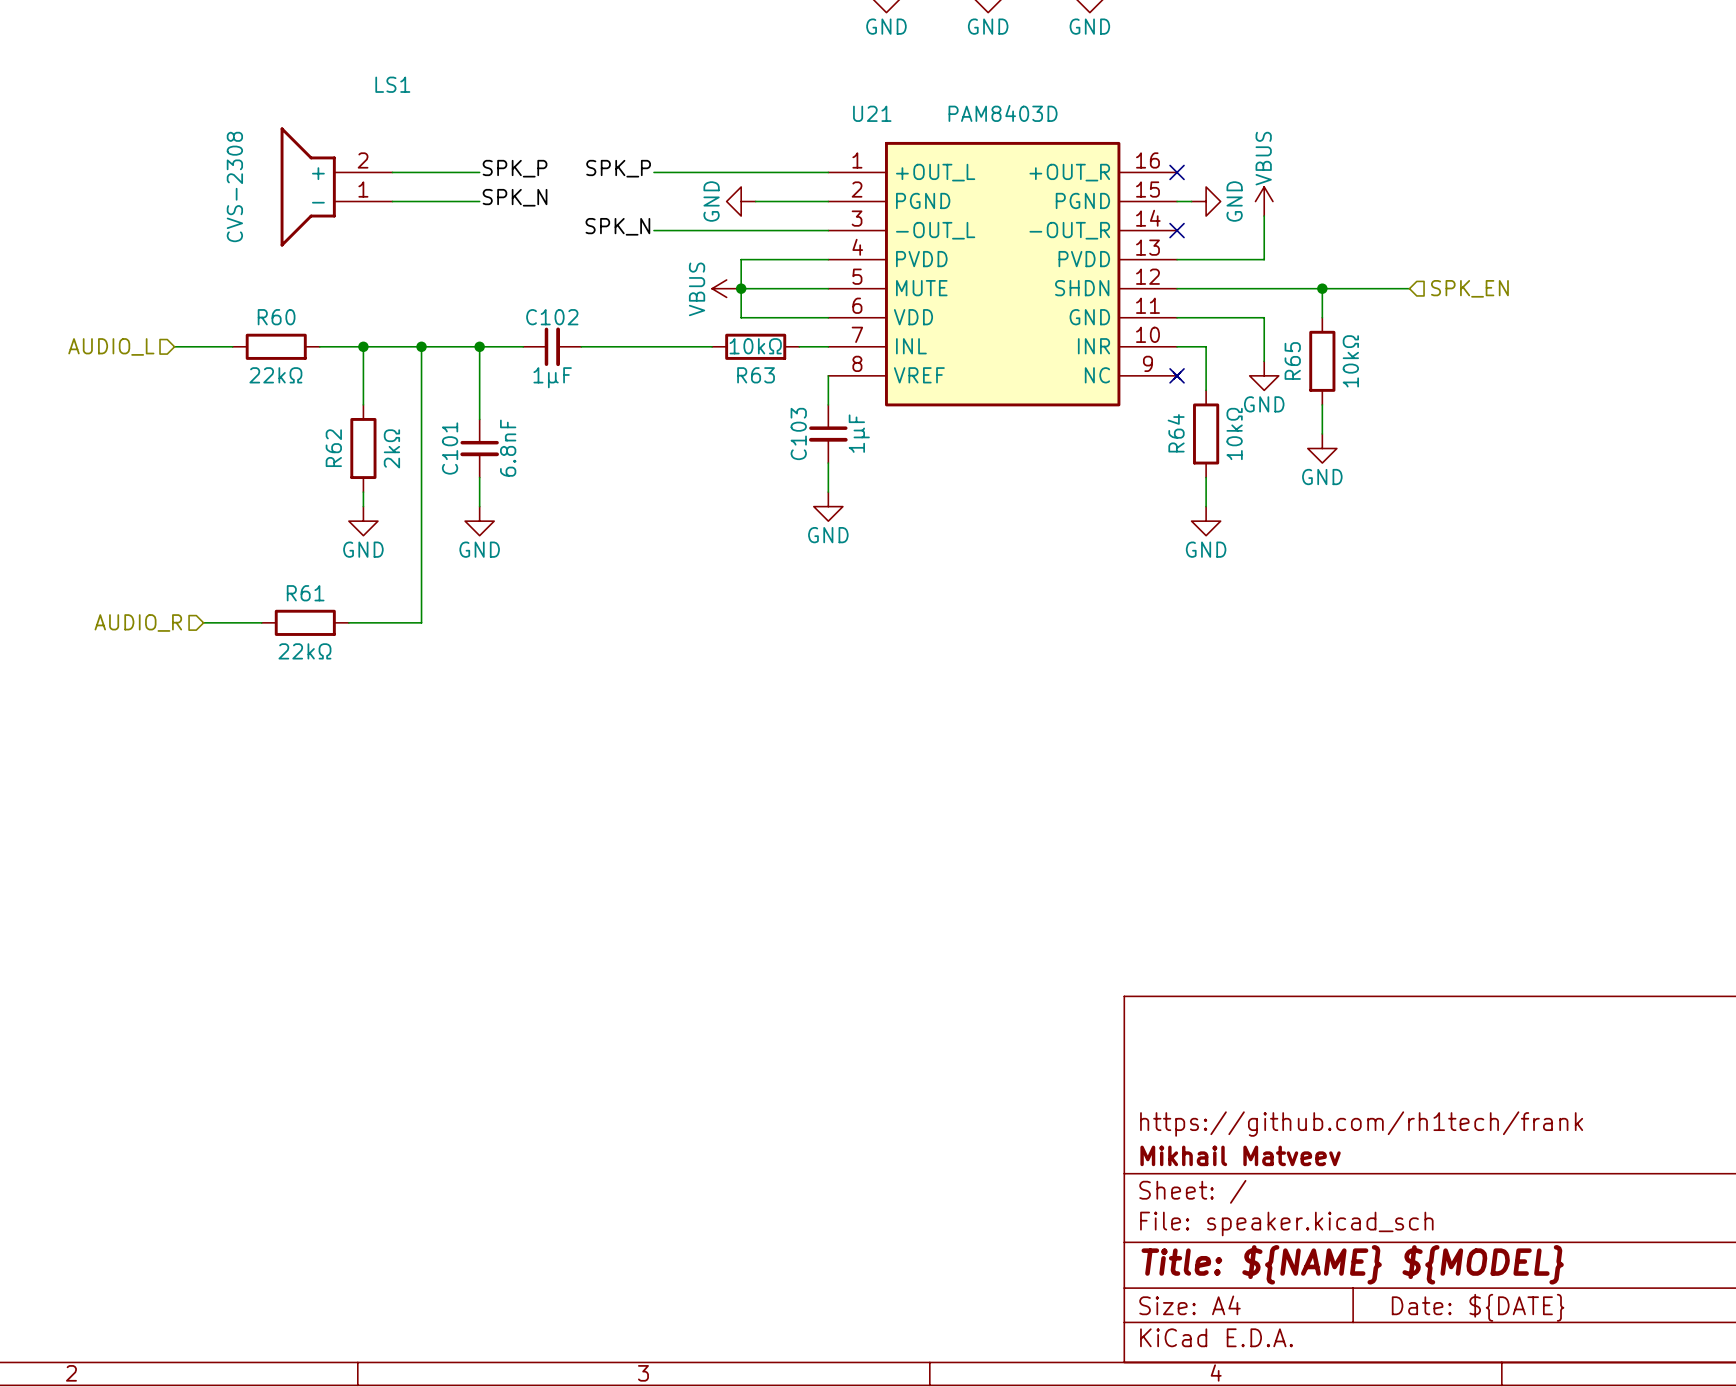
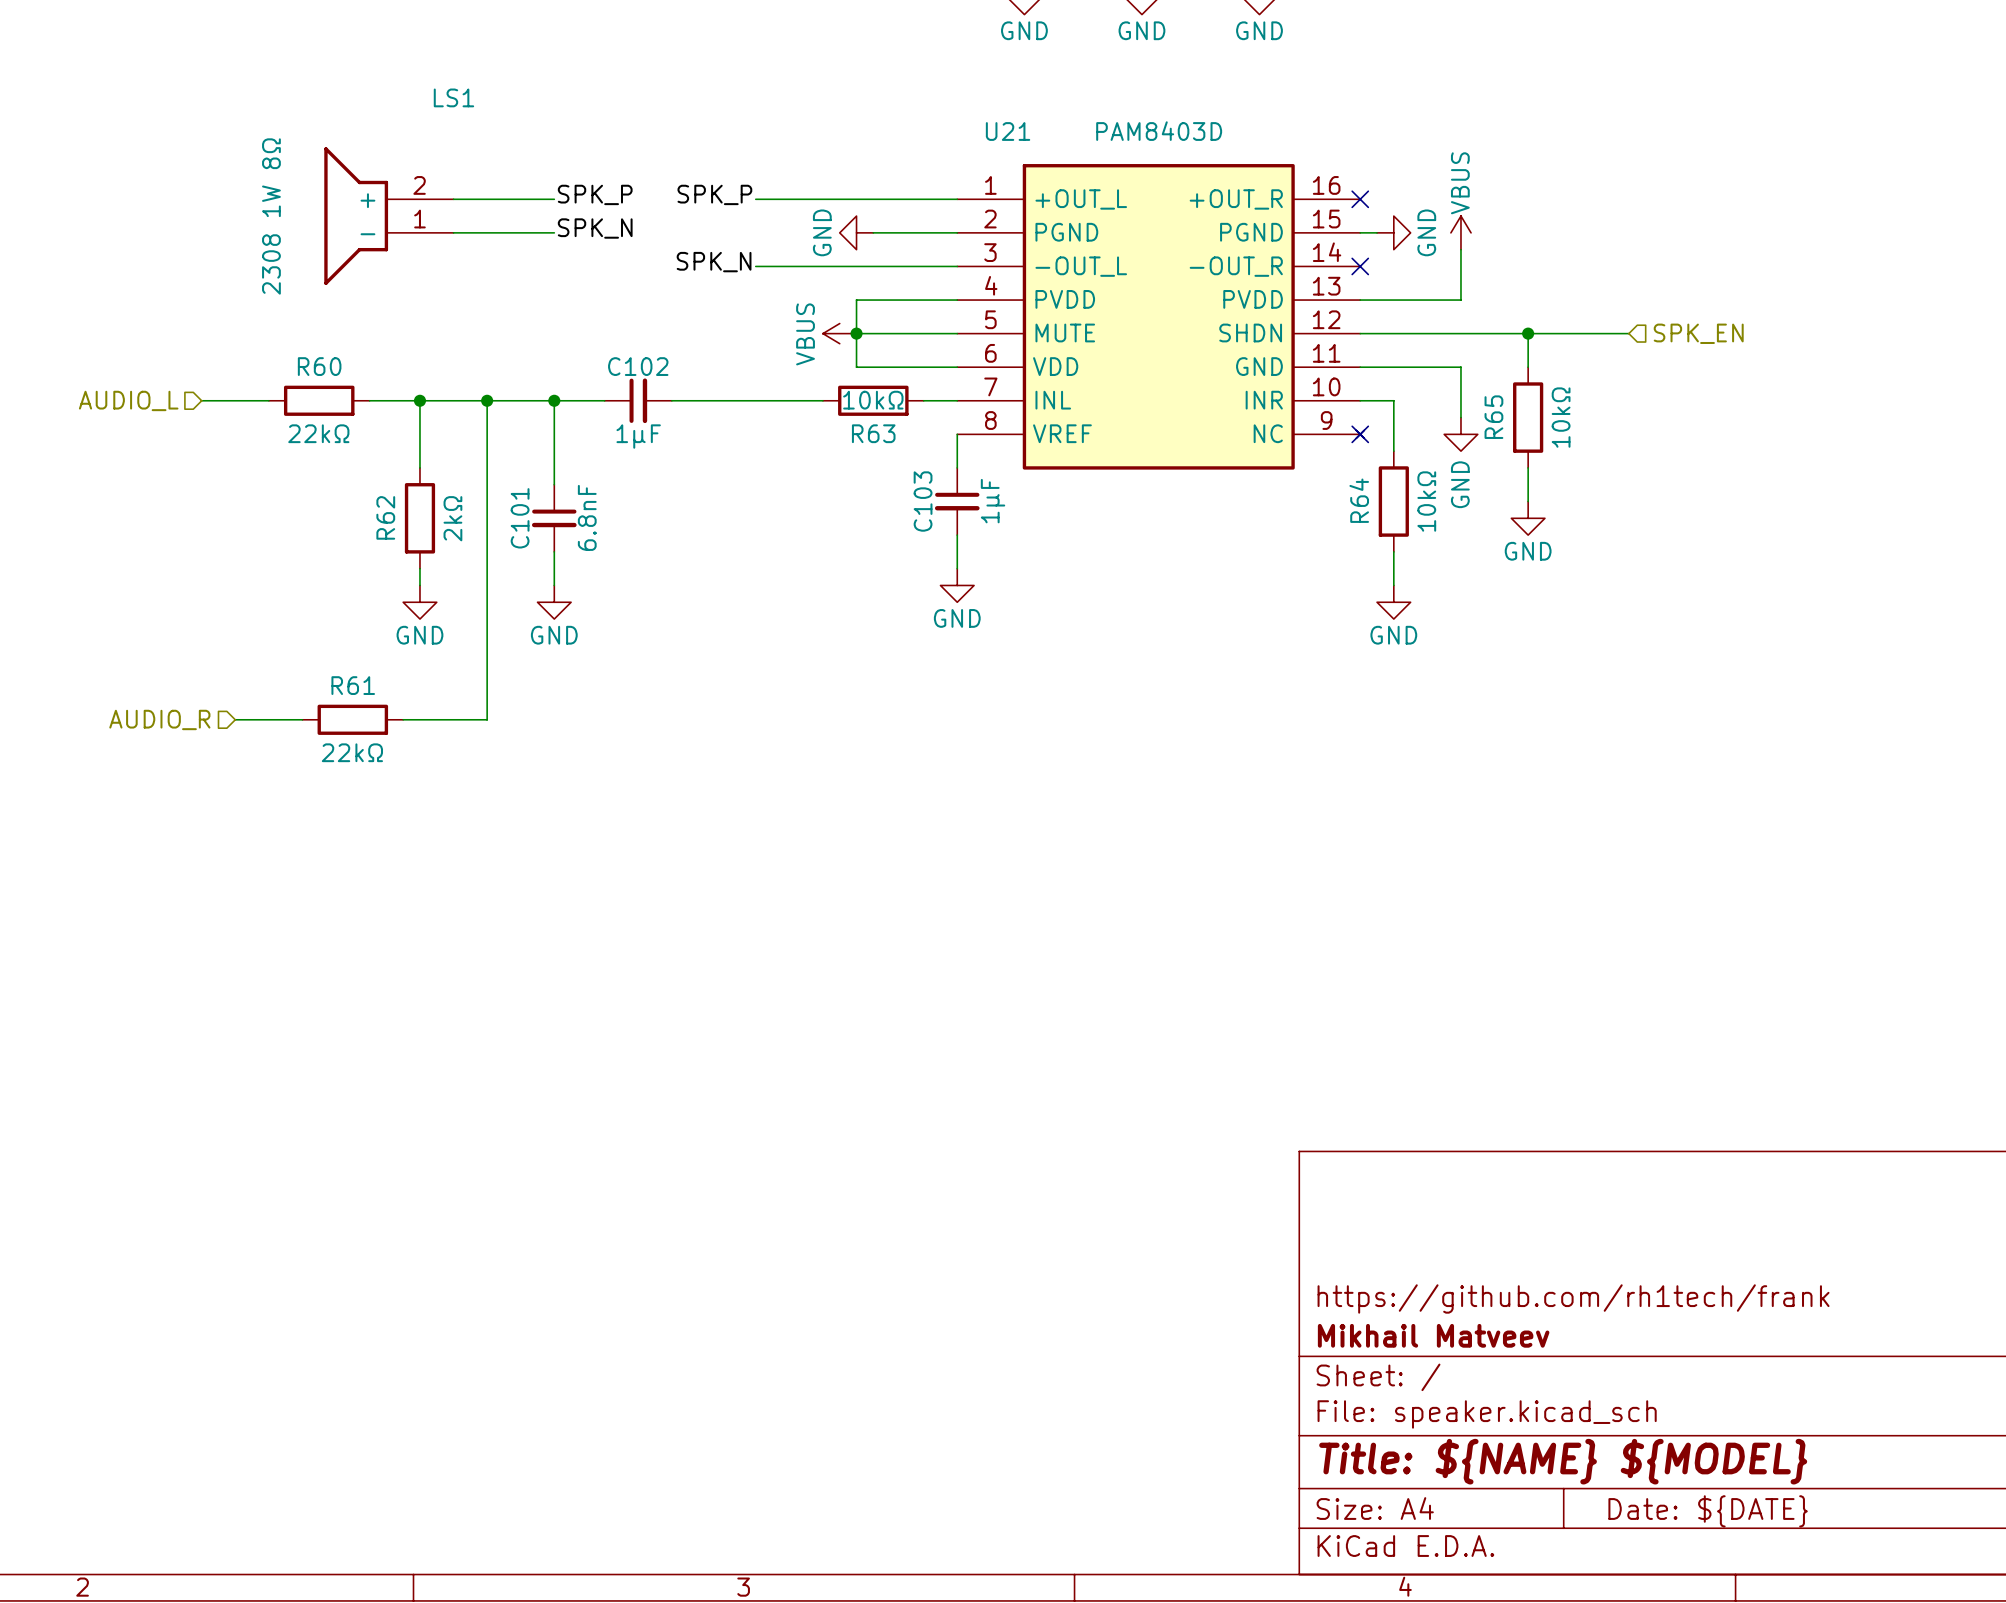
LS1 value: CVS-2308 (234, 186) -> 2308 1W 8Ω (271, 216)
power symbol text rotation: 0° (1264, 404) -> 90° counterclockwise (1460, 484)

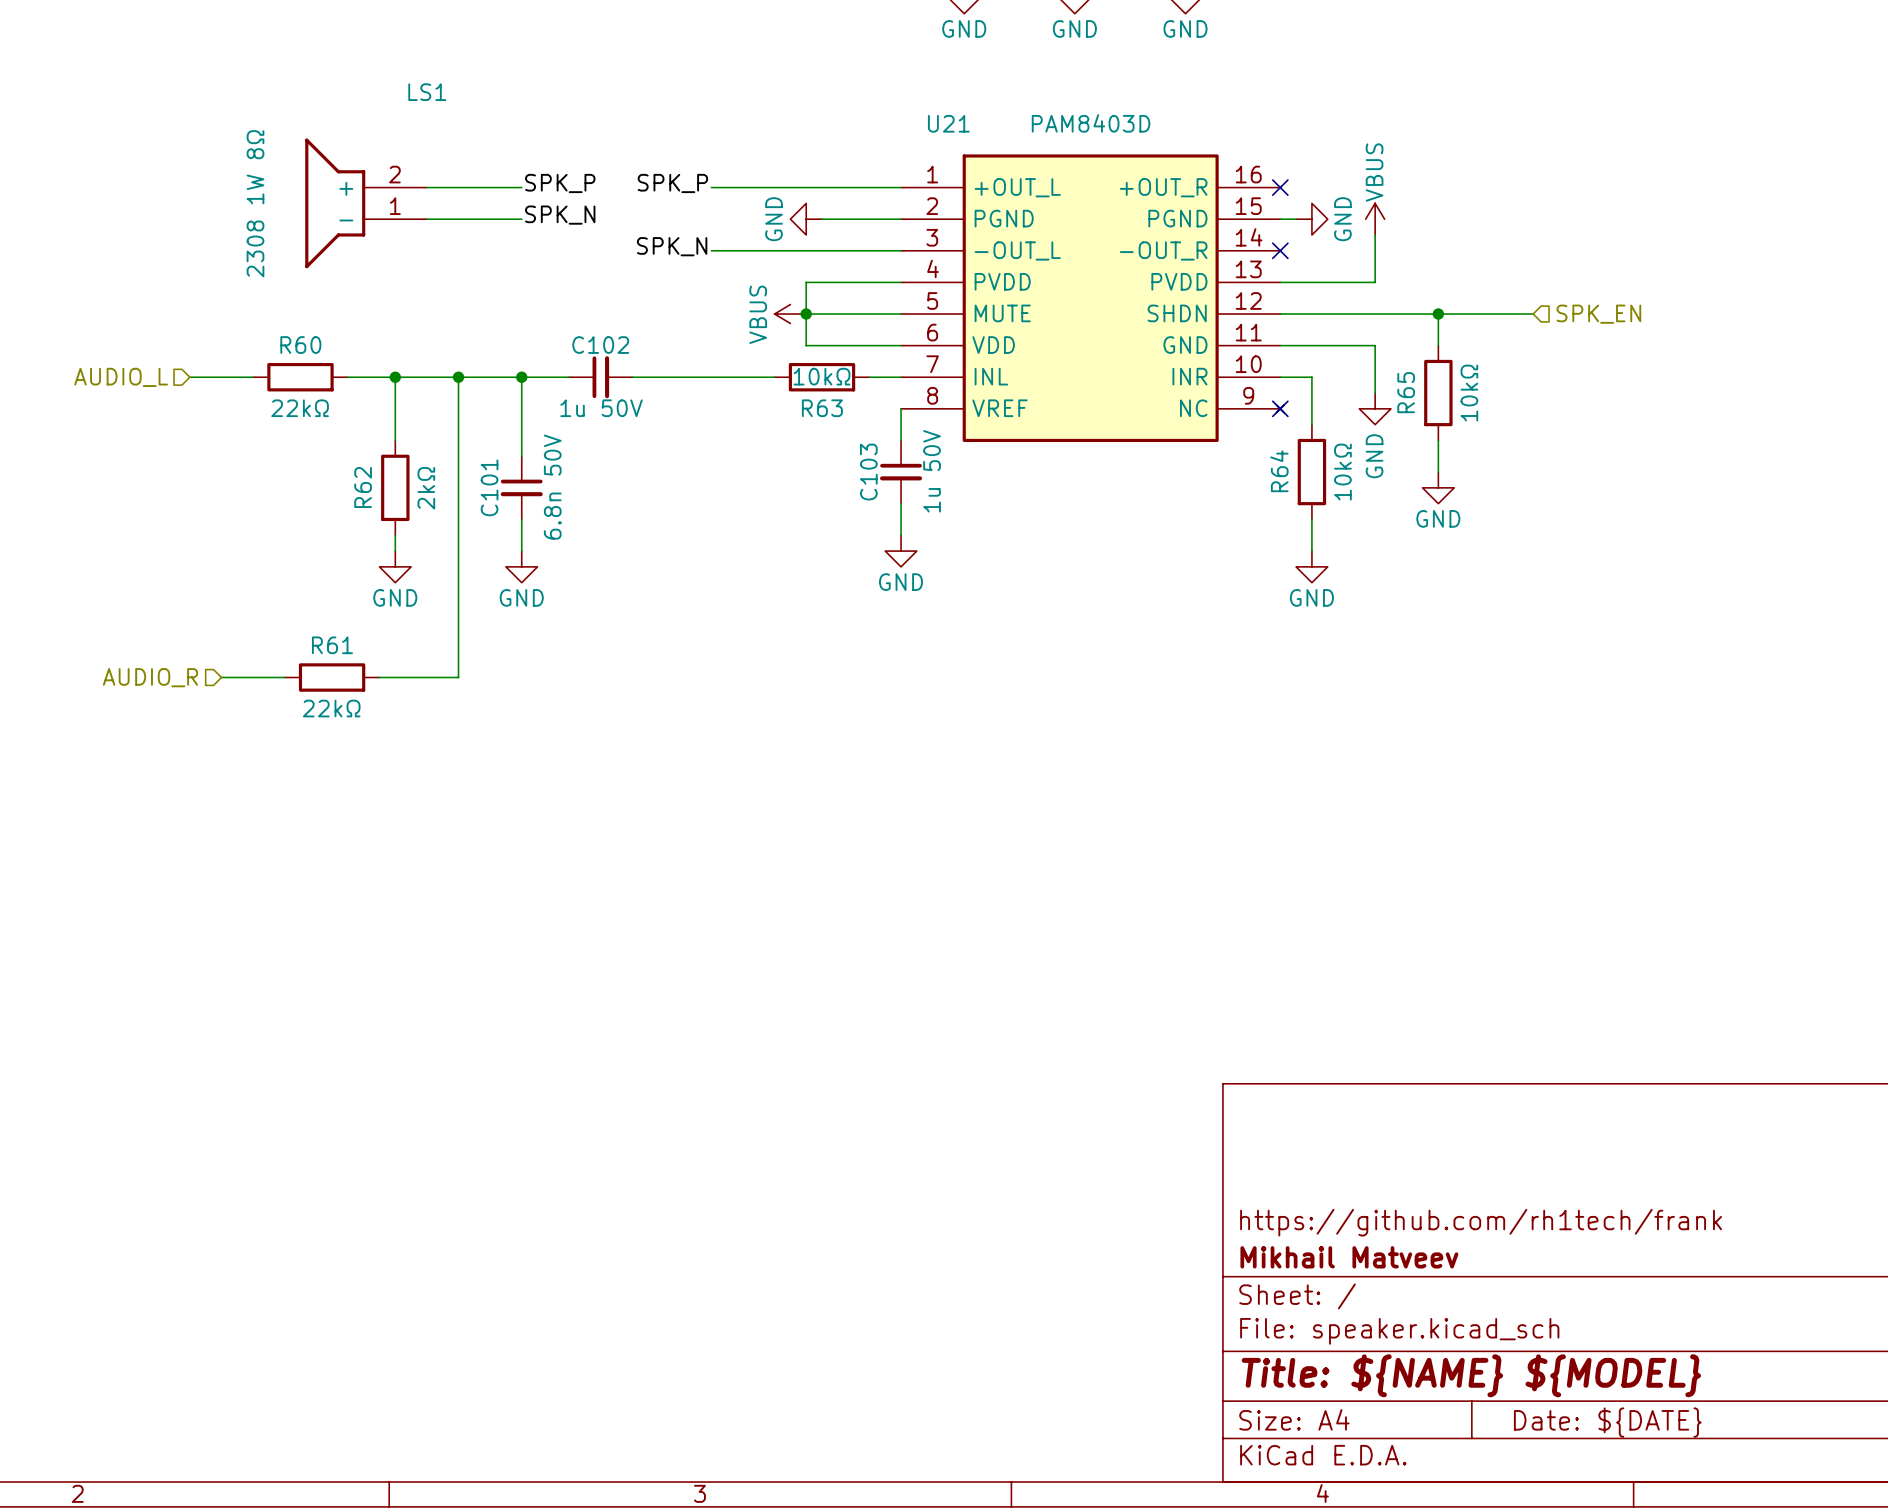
C102 value: 1µF (638, 436) -> 1u 50V (601, 408)
C103 value: 1µF (993, 501) -> 1u 50V (932, 471)
C101 value: 6.8nF (587, 517) -> 6.8n 50V (552, 487)

